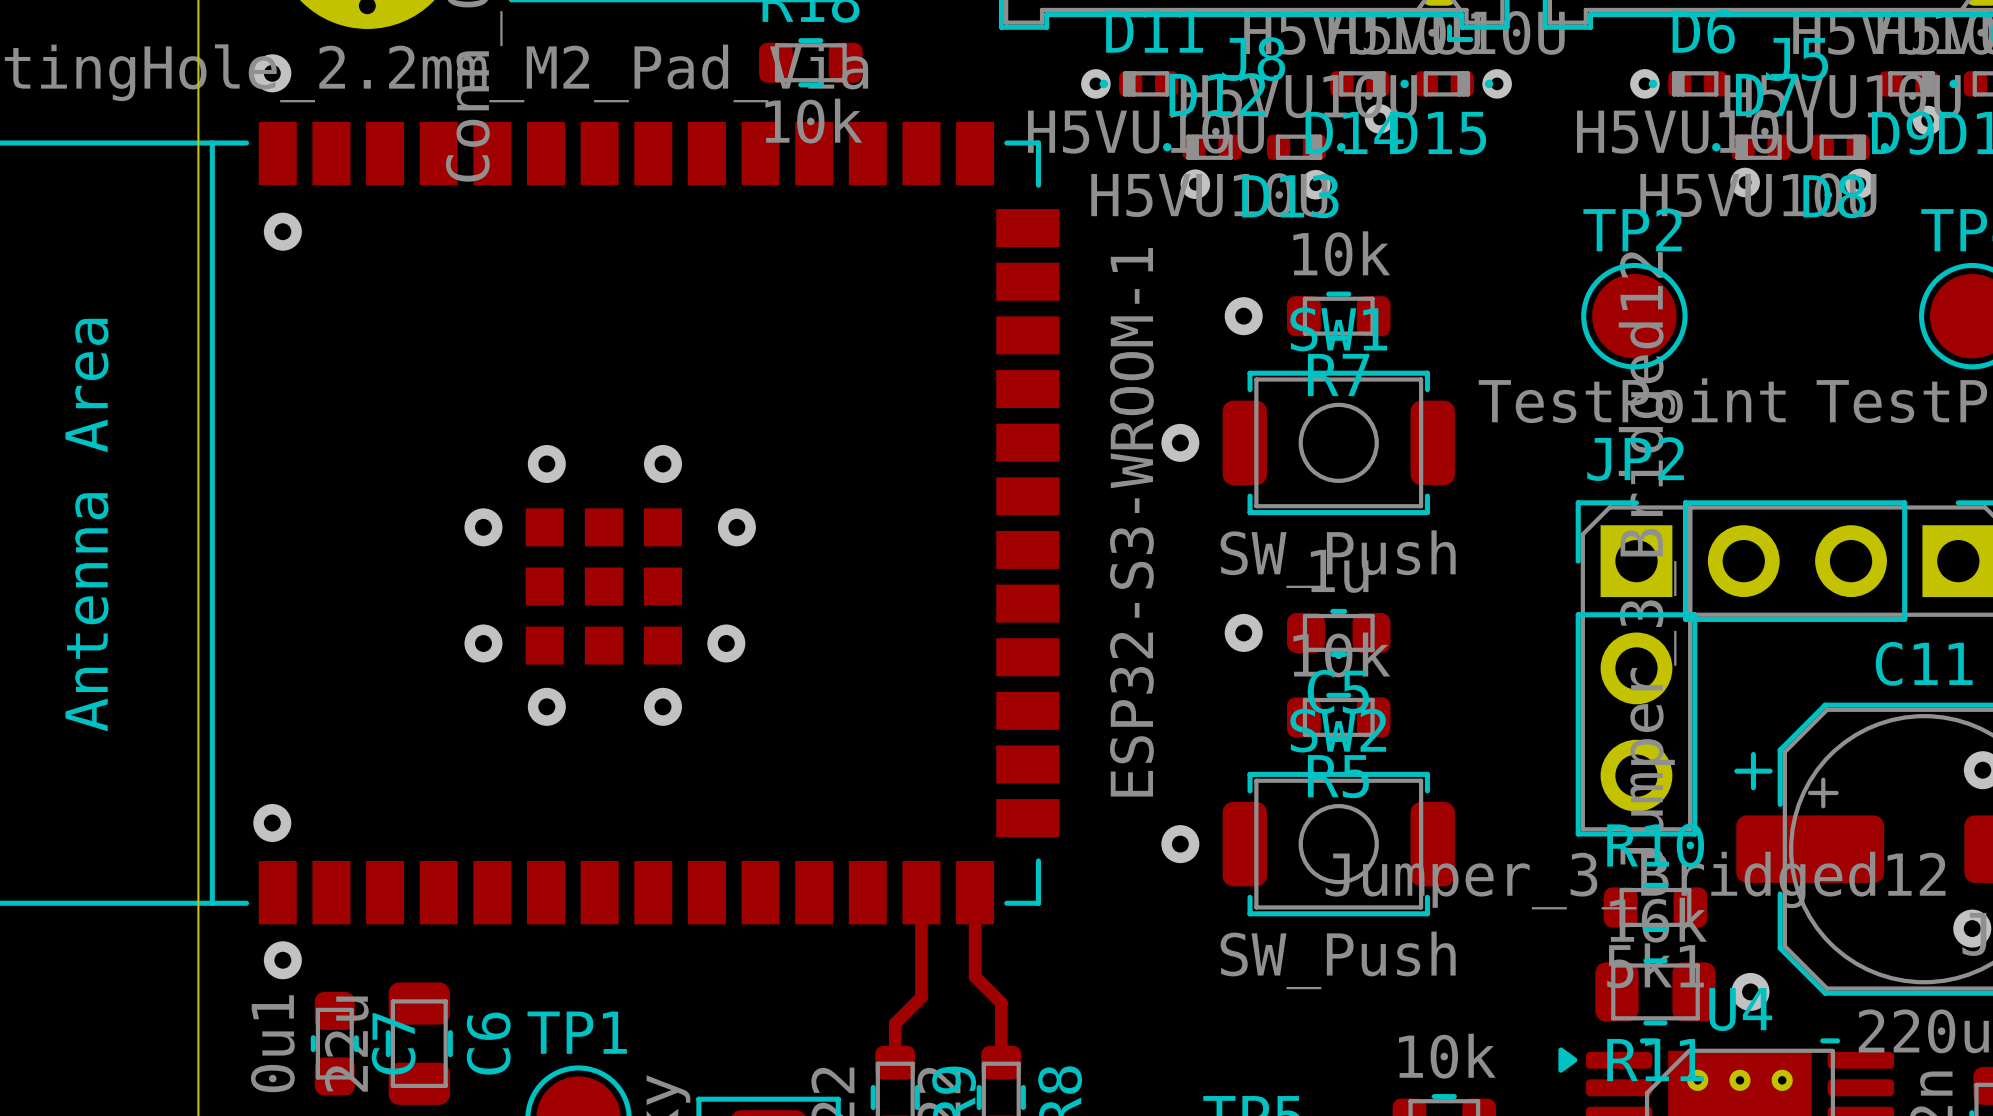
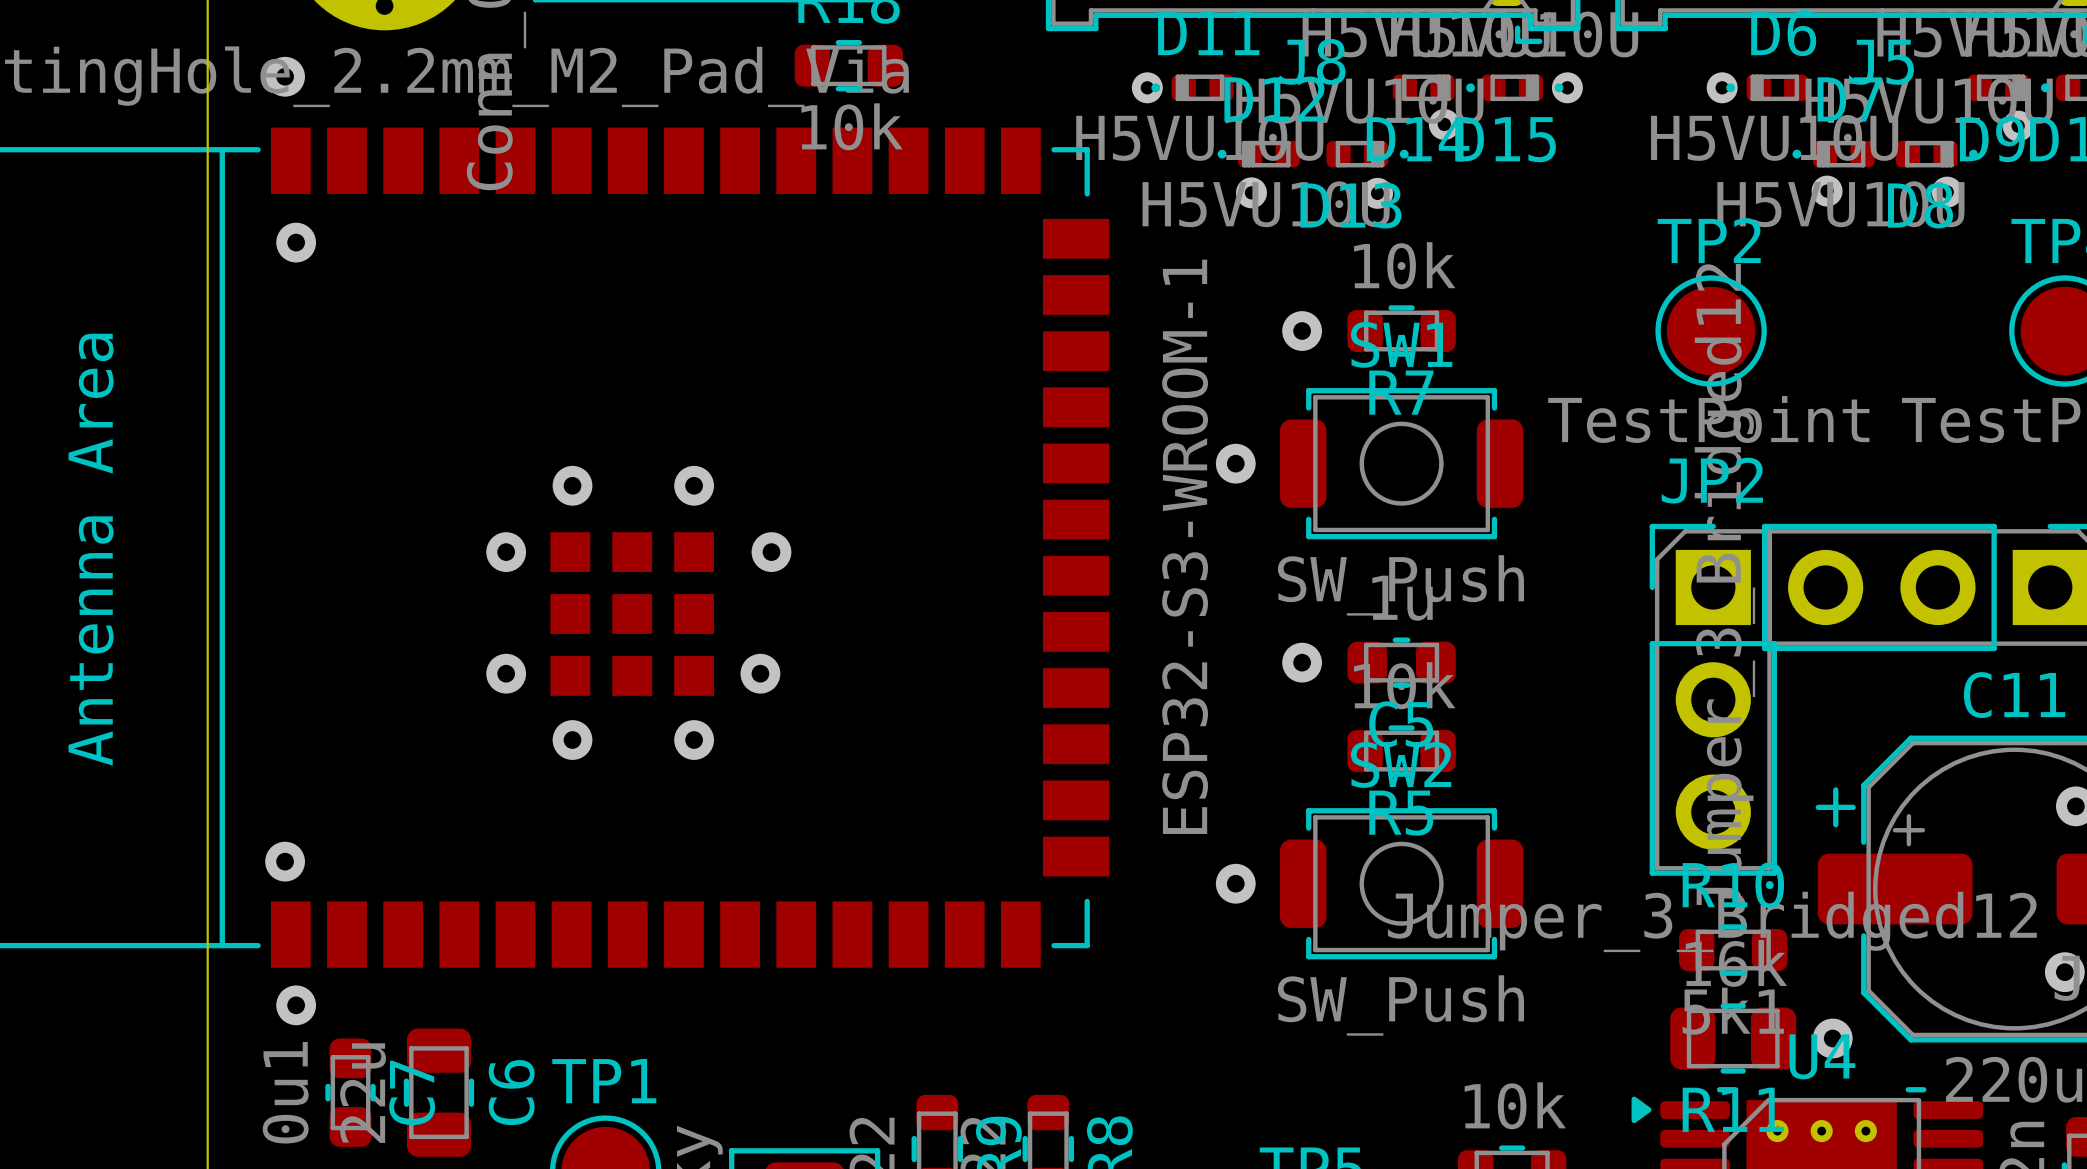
top track: (921, 892) (921, 997) (895, 1023) (895, 1062) -> none
top track: (975, 892) (975, 976) (1001, 1002) (1001, 1062) -> none

